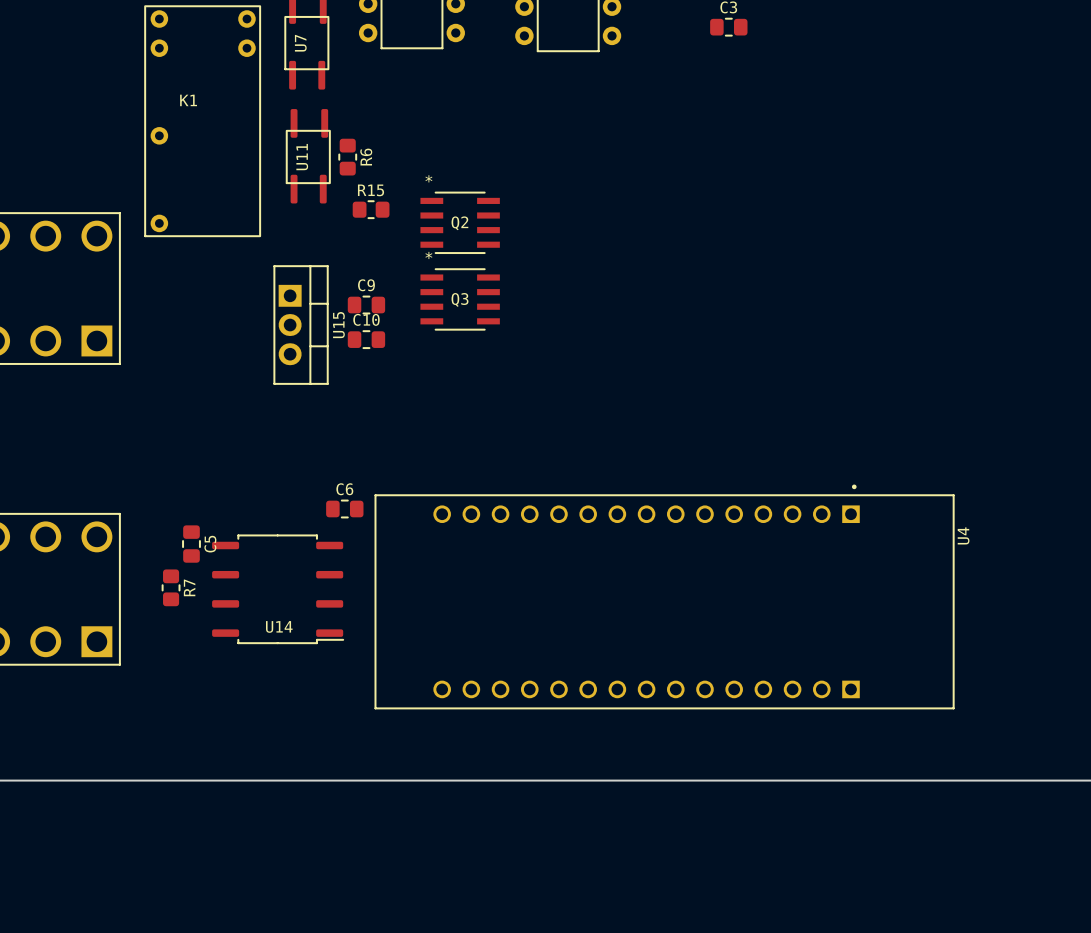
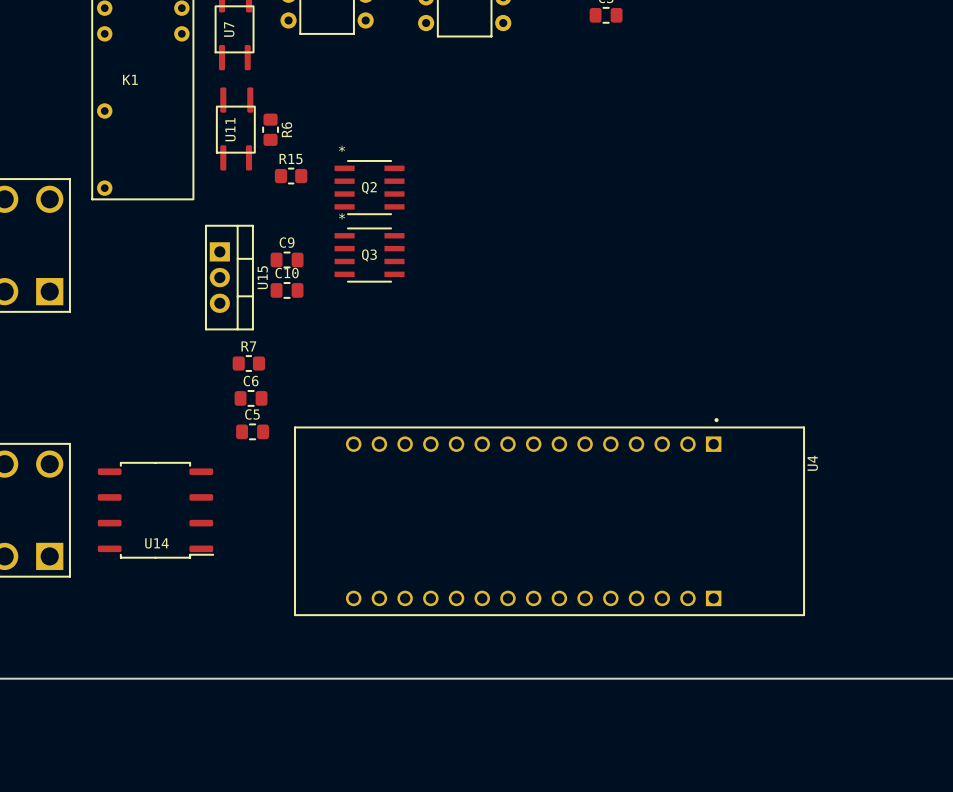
C6 position: (344, 508) -> (251, 398)
C5 rotation: 0° (191, 544) -> 90° clockwise (252, 431)
C5 position: (191, 544) -> (252, 431)
C5 name position: C5 (210, 544) -> C5 (252, 414)
R7 rotation: 0° (171, 587) -> 90° clockwise (248, 363)
R7 position: (171, 587) -> (248, 363)
R7 name position: R7 (189, 587) -> R7 (248, 346)
U14 position: (277, 589) -> (155, 510)

